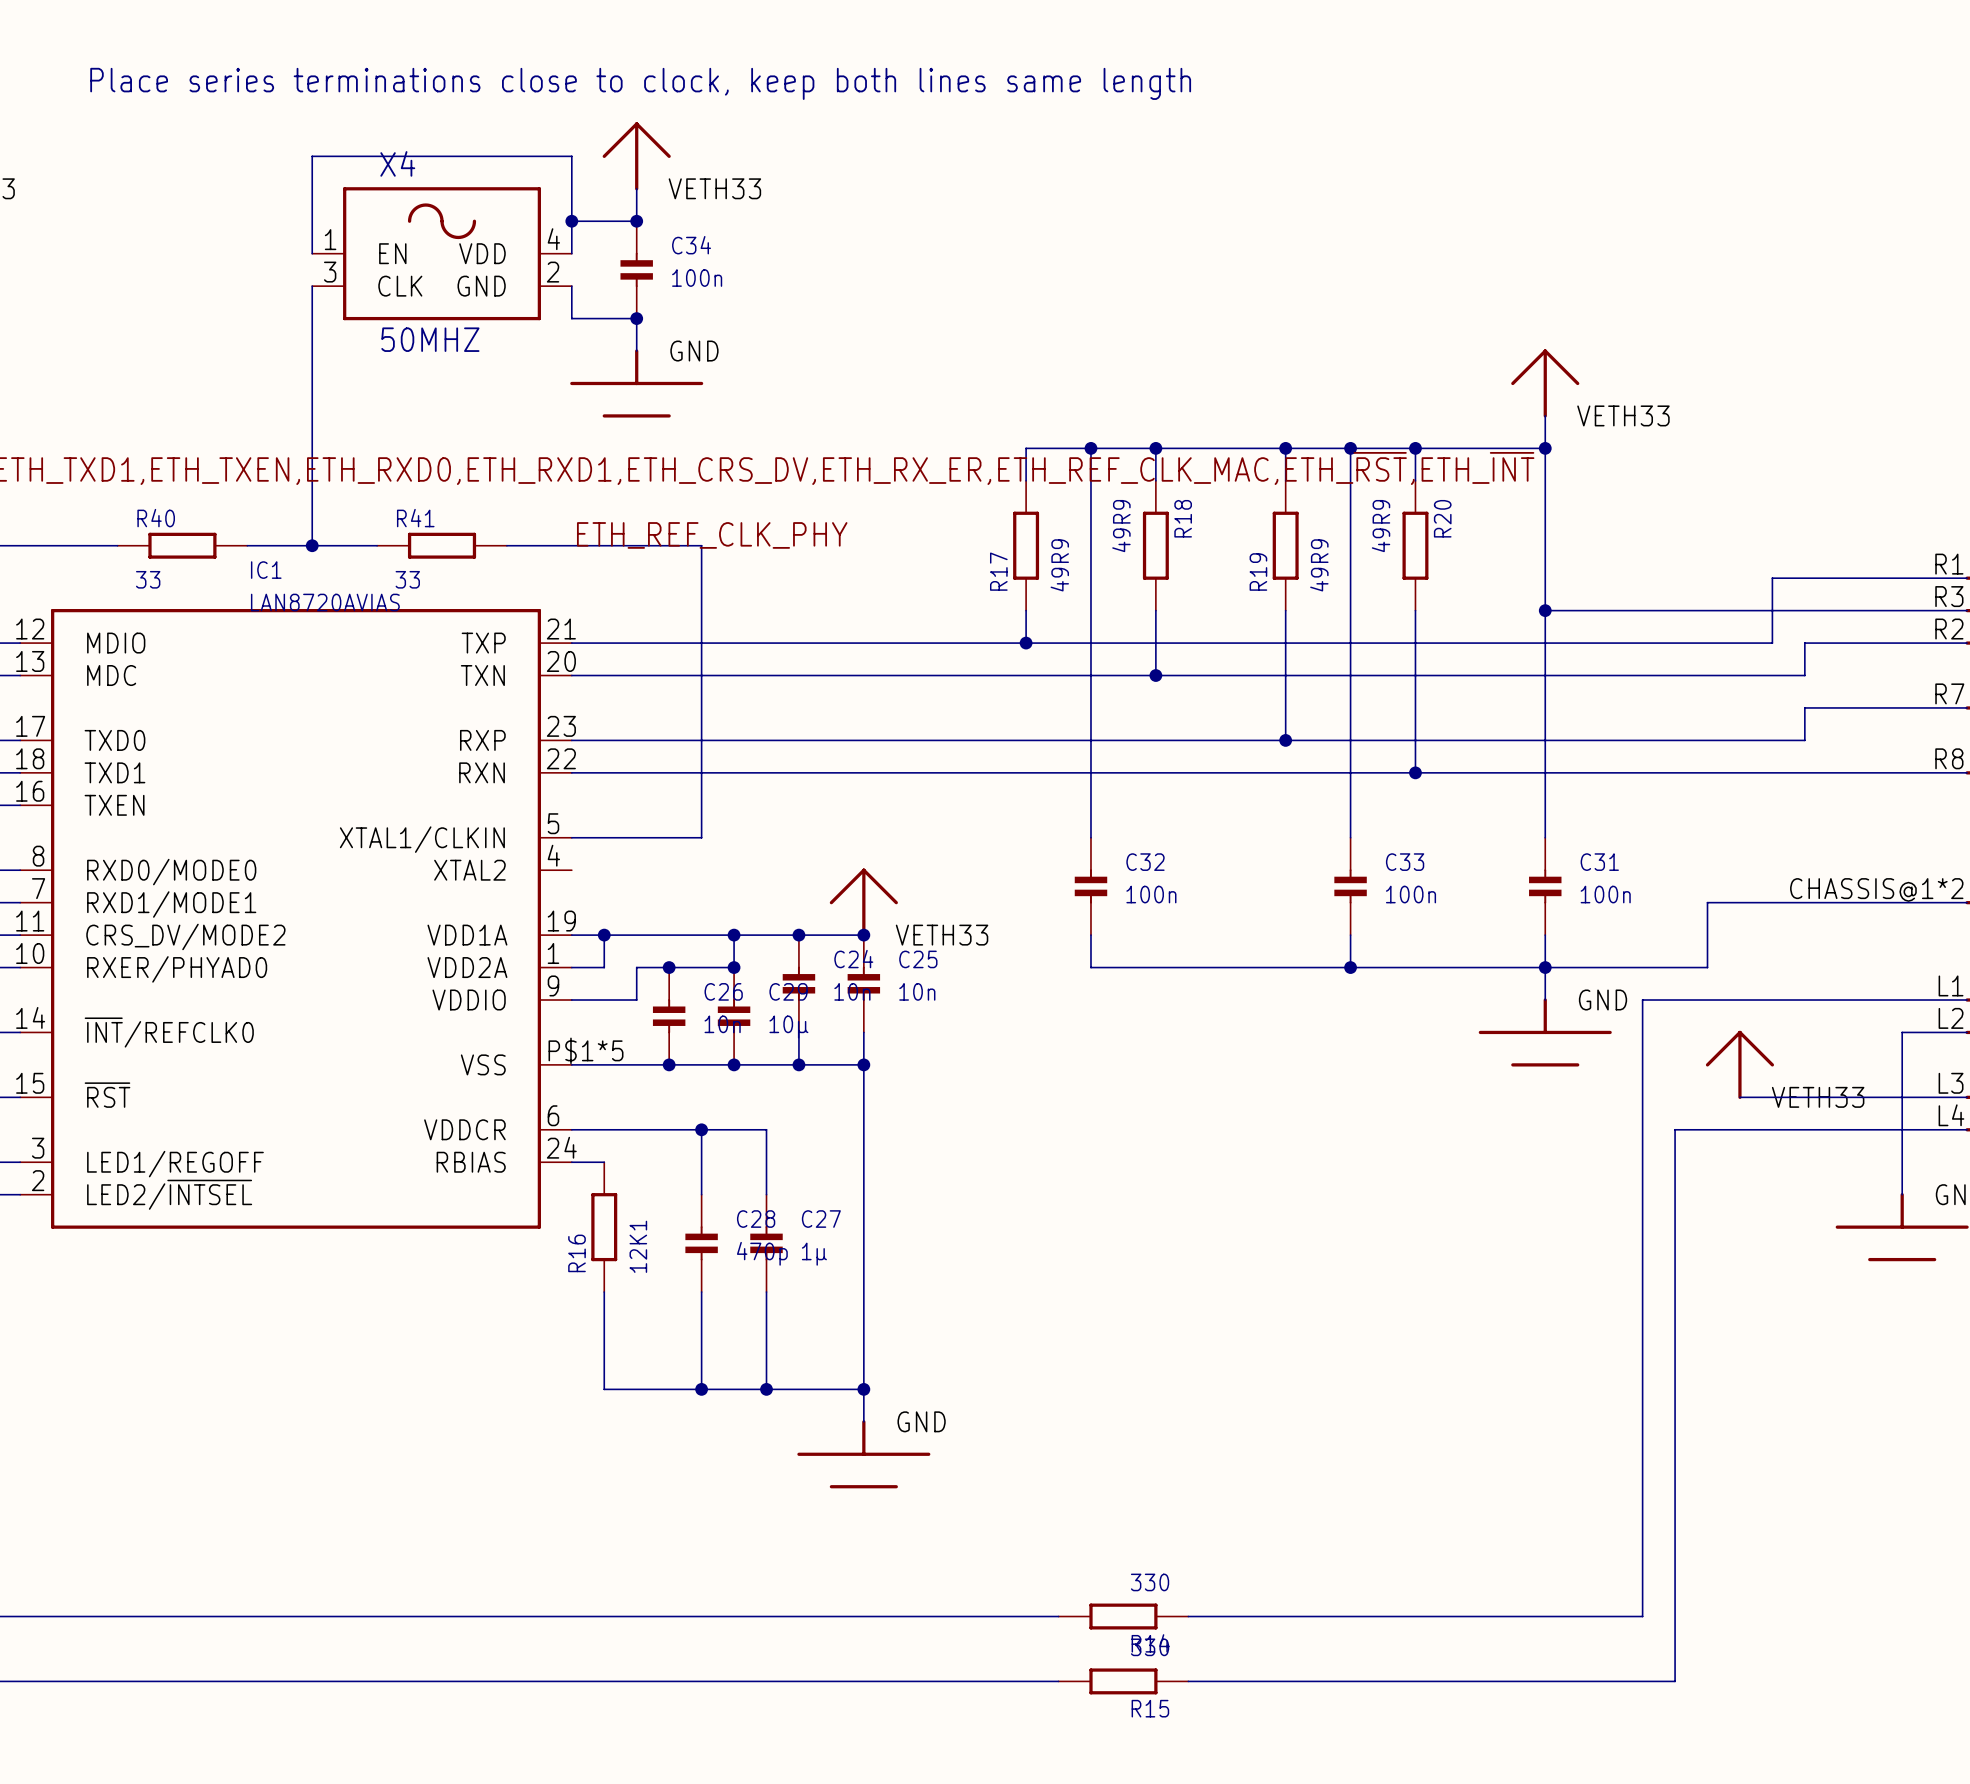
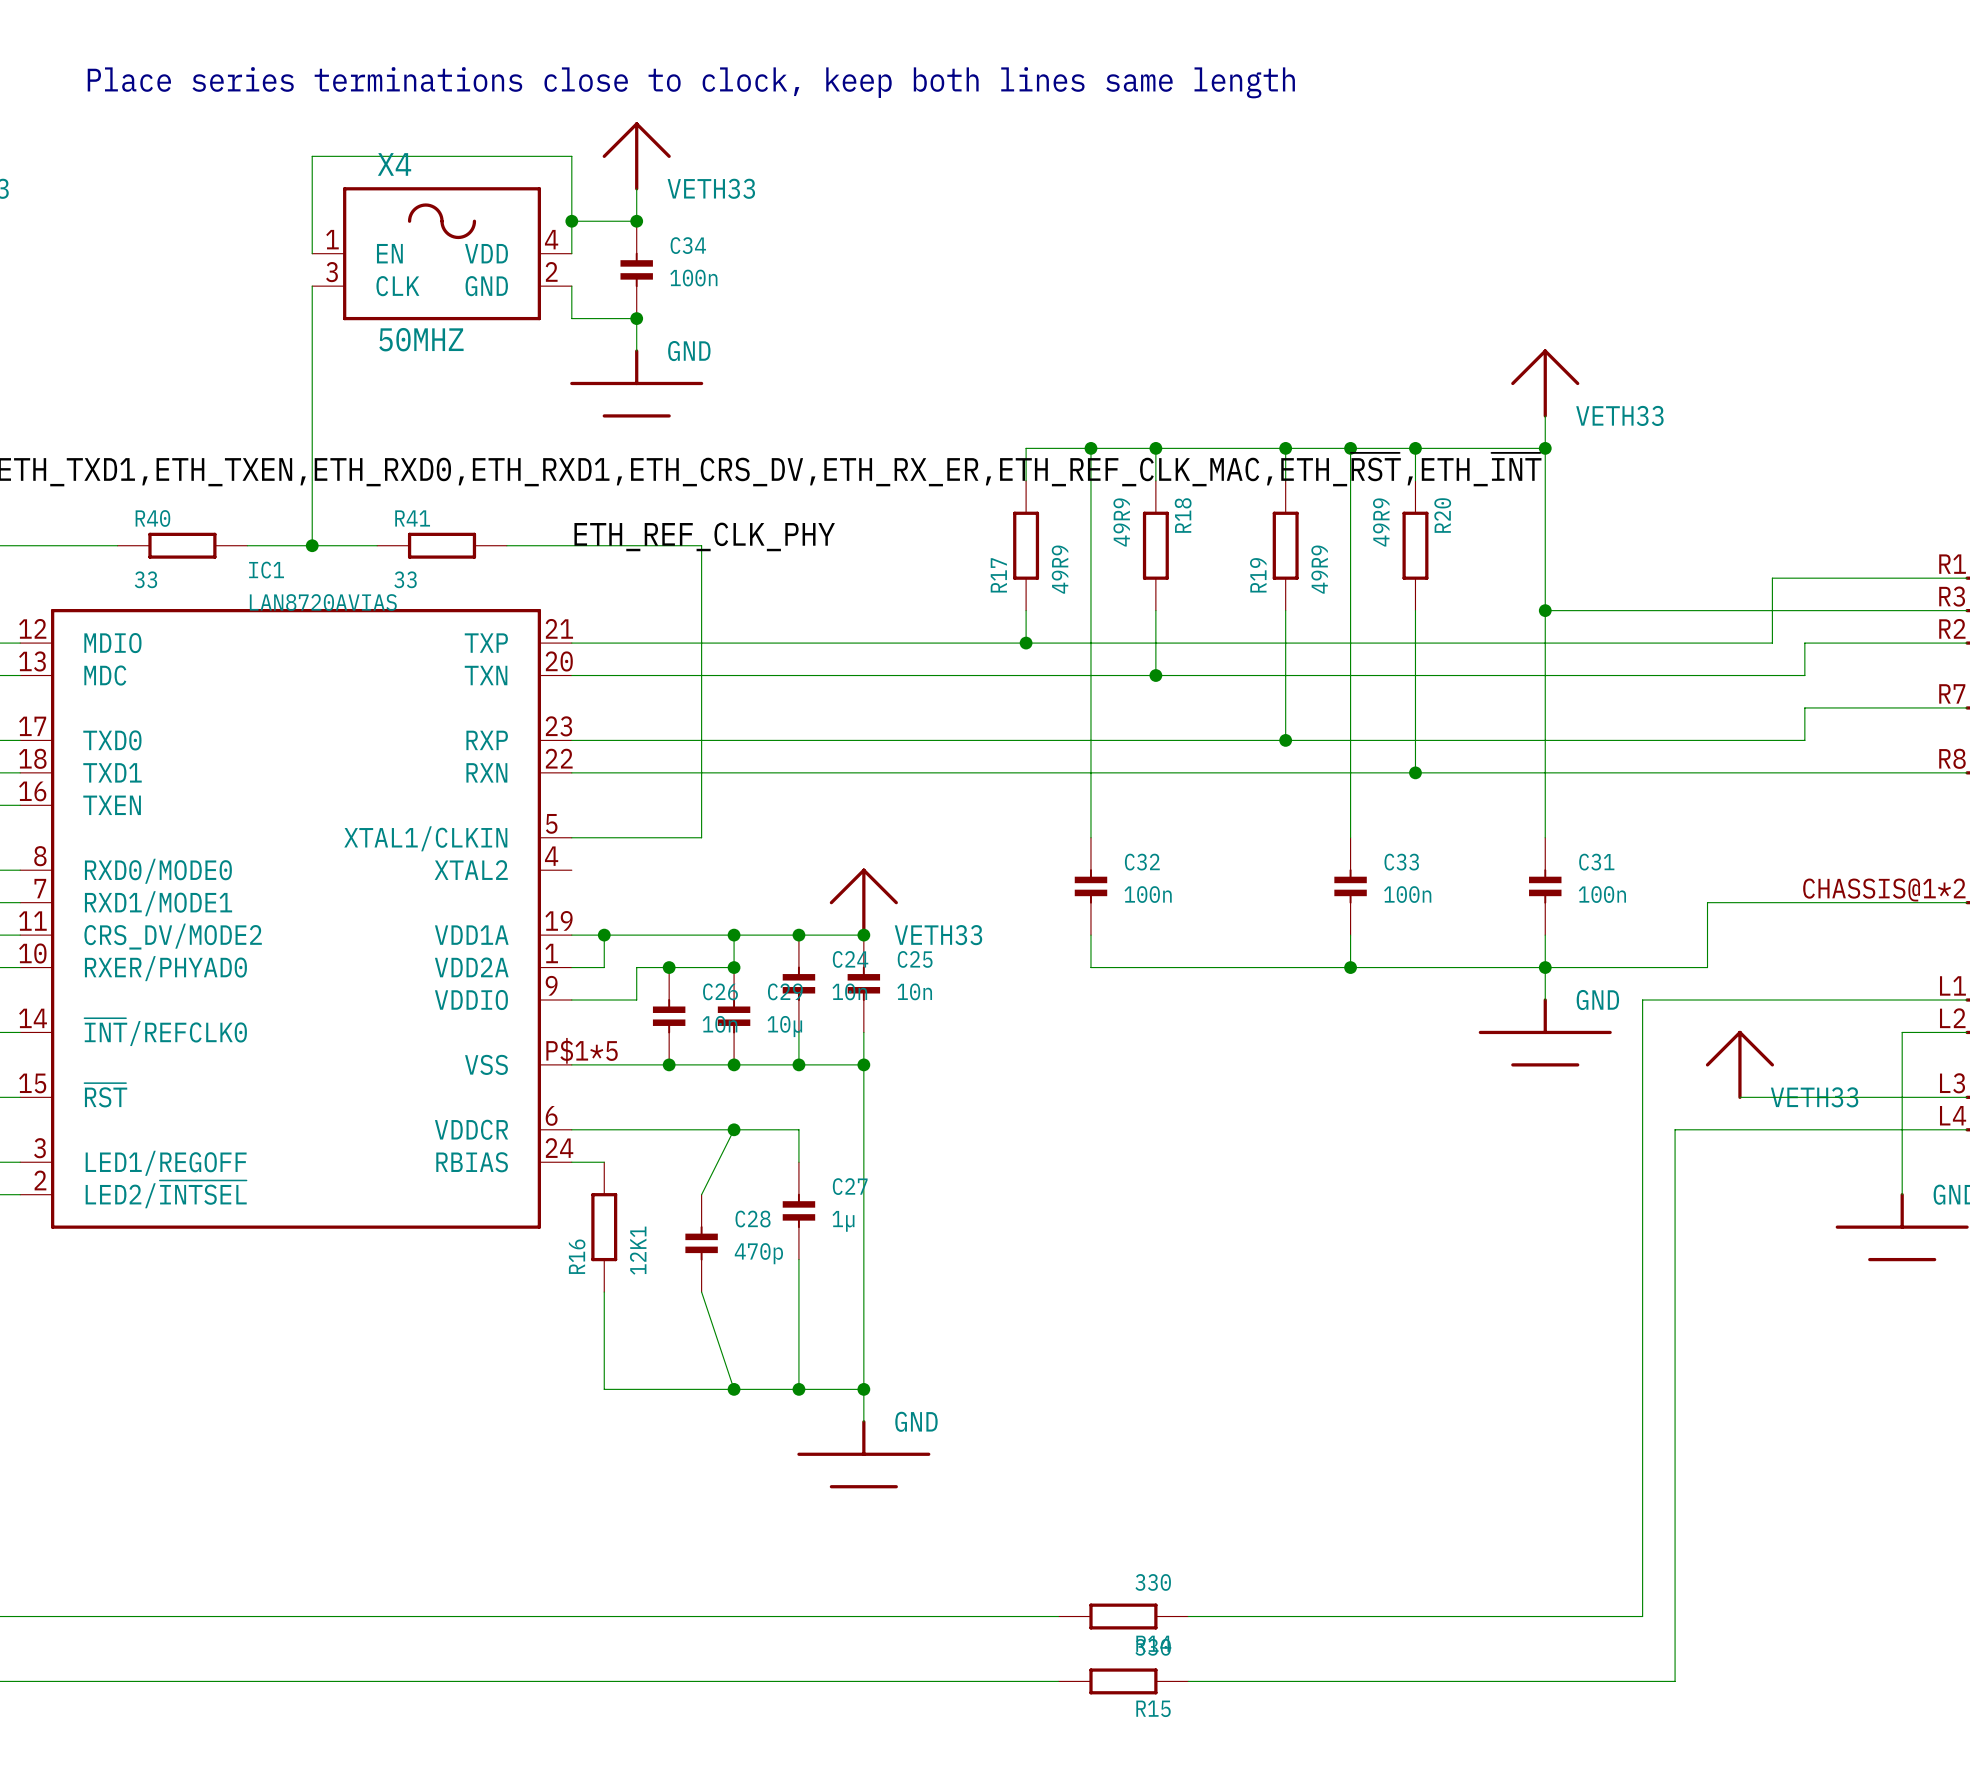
wire: (701, 1129) (701, 1194) -> (734, 1129) (701, 1194)
junction position: (701, 1129) -> (734, 1129)
wire: (766, 1129) (766, 1194) -> (766, 1129) (798, 1129) (798, 1162)
C27 position: (766, 1243) -> (798, 1210)
wire: none -> (798, 1259) (798, 1389)
wire: (701, 1292) (701, 1389) -> (701, 1292) (734, 1389)
wire: (766, 1292) (766, 1389) -> none
junction: (701, 1389) -> none
junction: none -> (734, 1389)
junction: (766, 1389) -> none
junction: none -> (798, 1389)

